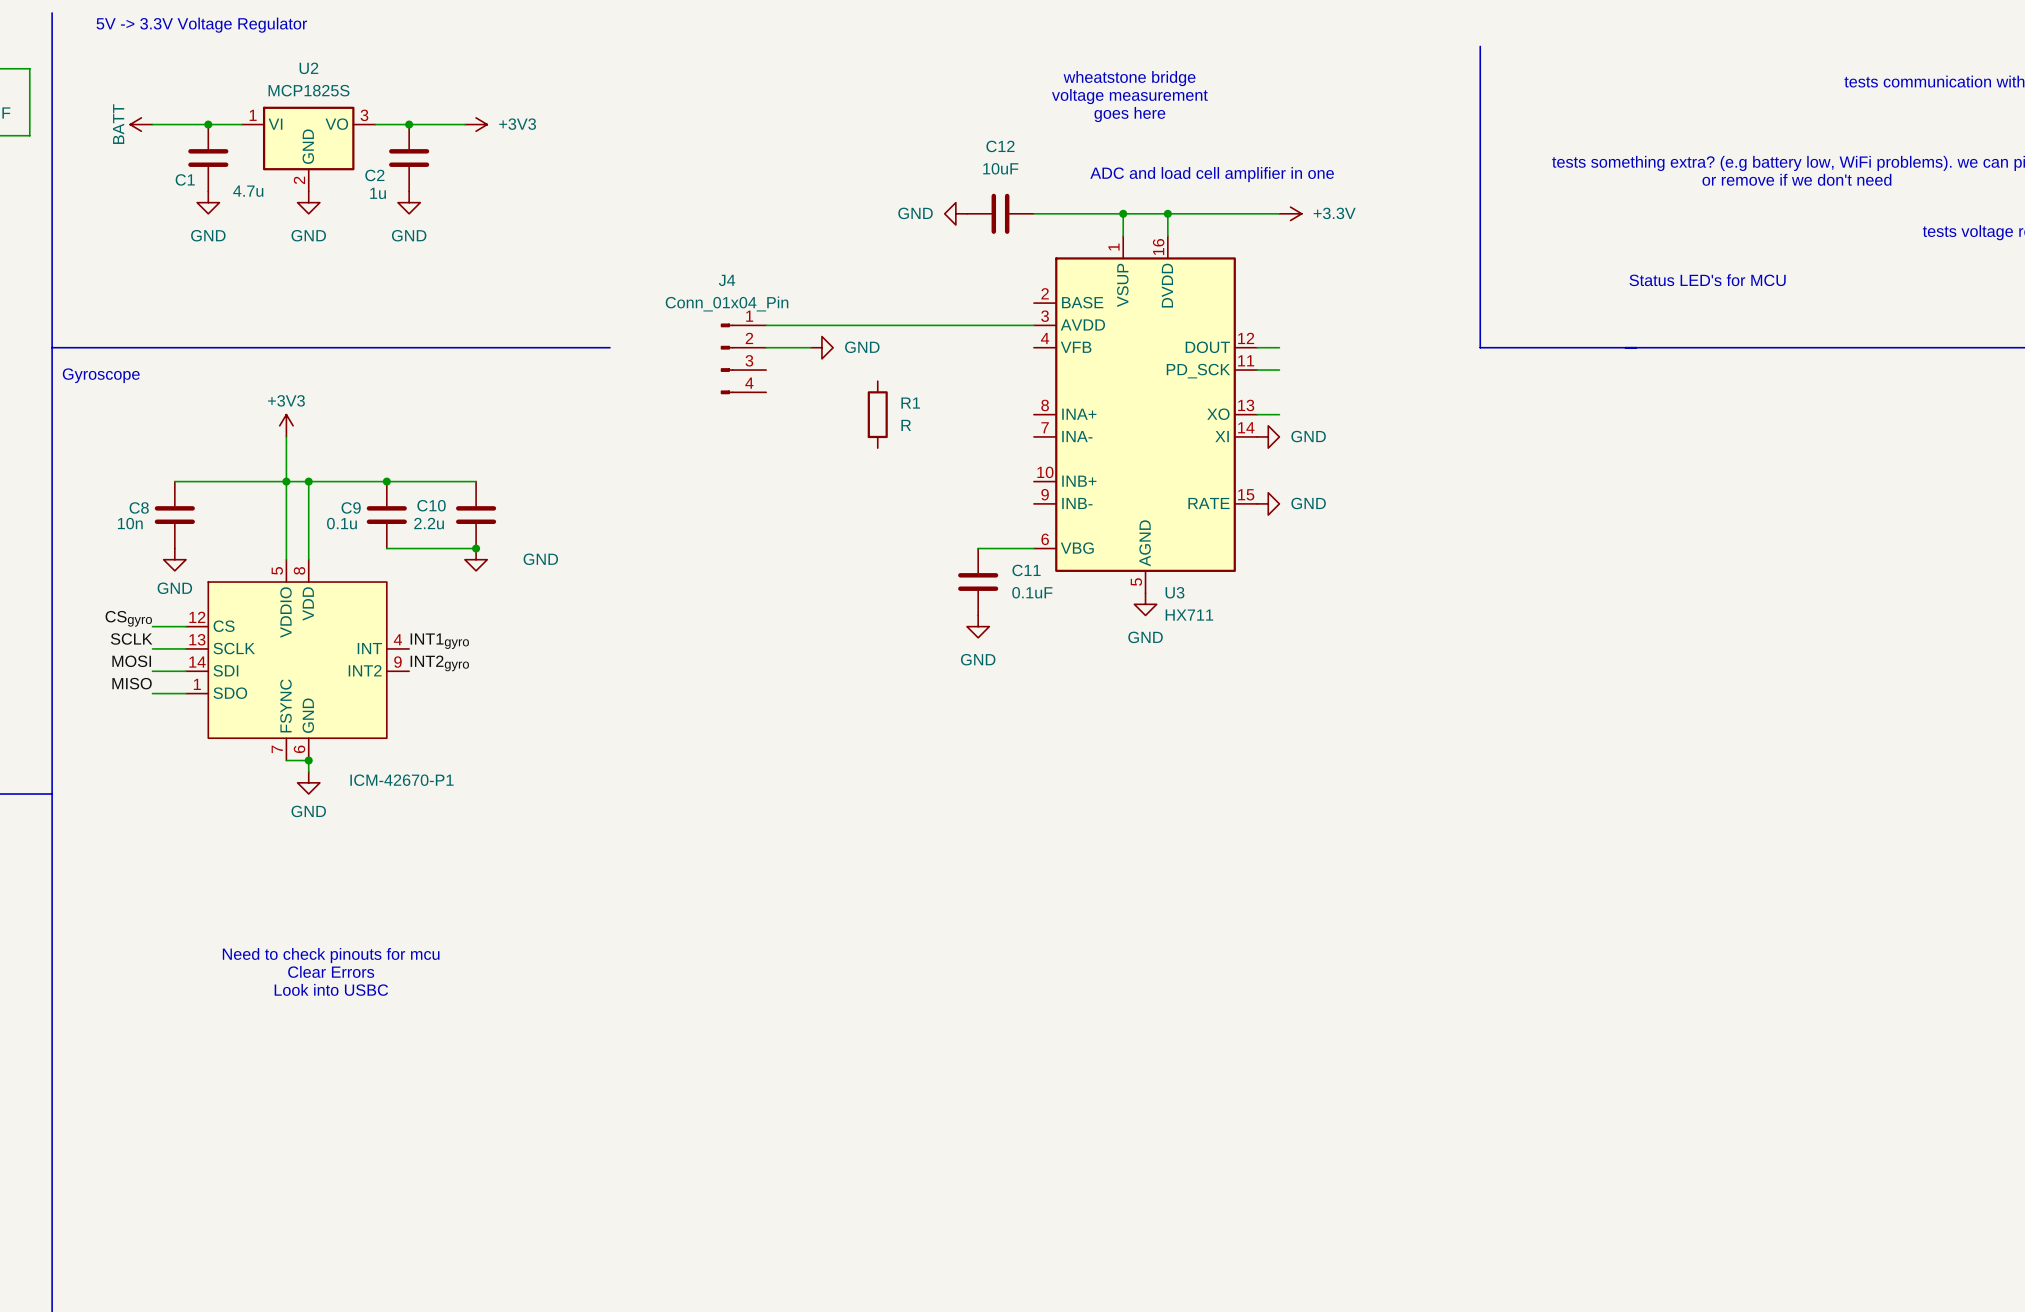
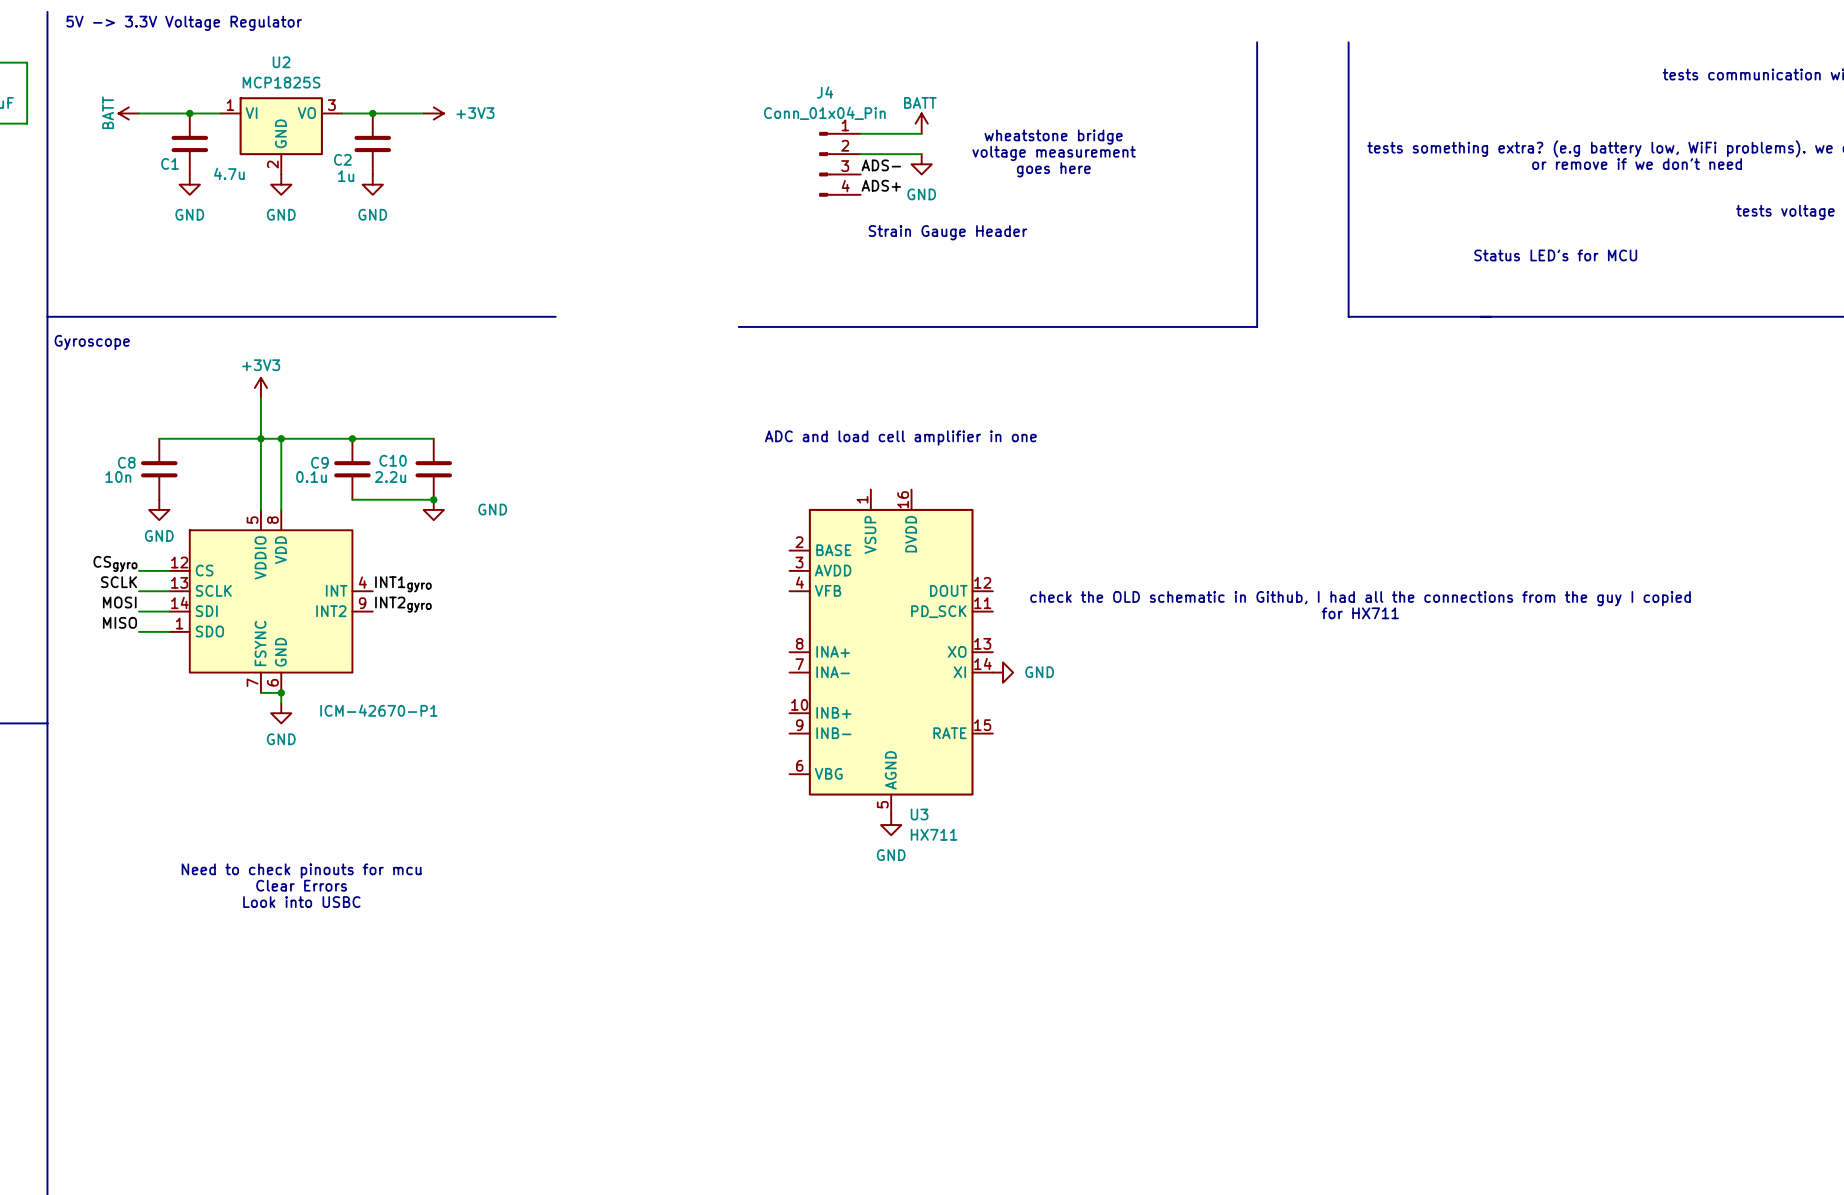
line: none -> (1257, 42) (1257, 326) (738, 326)
text position: wheatstone bridge (1129, 78) -> wheatstone bridge (1053, 137)
text position: voltage measurement (1129, 96) -> voltage measurement (1054, 153)
text position: goes here (1129, 114) -> goes here (1053, 169)
power symbol: none -> BATT (921, 123)
wire: none -> (860, 133) (921, 133)
wire: none -> (860, 154) (921, 154)
text: ADC and load cell amplifier in one (1212, 174) -> none
label: none -> ADS- (881, 165)
label: none -> ADS+ (881, 185)
power symbol rotation: 0° (955, 213) -> 90° counterclockwise (921, 164)
power symbol position: GND (955, 213) -> GND (921, 164)
C12: 10uF (1000, 213) -> none
wire: (1033, 213) (1279, 213) -> none
wire: (1123, 213) (1123, 236) -> none
junction: (1123, 213) -> none
wire: (1167, 213) (1167, 236) -> none
junction: (1167, 213) -> none
power symbol: +3.3V (1290, 213) -> none
text: none -> Strain Gauge Header (947, 232)
wire: (766, 325) (1033, 325) -> none
wire: (766, 347) (810, 347) -> none
power symbol: GND (821, 347) -> none
wire: (1257, 347) (1279, 347) -> none
J4 position: (743, 358) -> (840, 164)
wire: (1257, 370) (1279, 370) -> none
R1: R (877, 414) -> none
U3 position: (1145, 414) -> (891, 652)
wire: (1257, 414) (1279, 414) -> none
power symbol: GND (1268, 436) -> none
text: none -> ADC and load cell amplifier in one (900, 438)
power symbol: GND (1268, 503) -> none
wire: (978, 548) (1033, 548) -> none
C11: 0.1uF (978, 582) -> none
power symbol: GND (1145, 604) -> none
power symbol: GND (978, 626) -> none
text: none -> check the OLD schematic in Github, I had all the connections from the guy I copied (1360, 598)
text: none -> for HX711 (1360, 613)
power symbol: none -> GND (1003, 672)
power symbol: none -> GND (891, 825)

